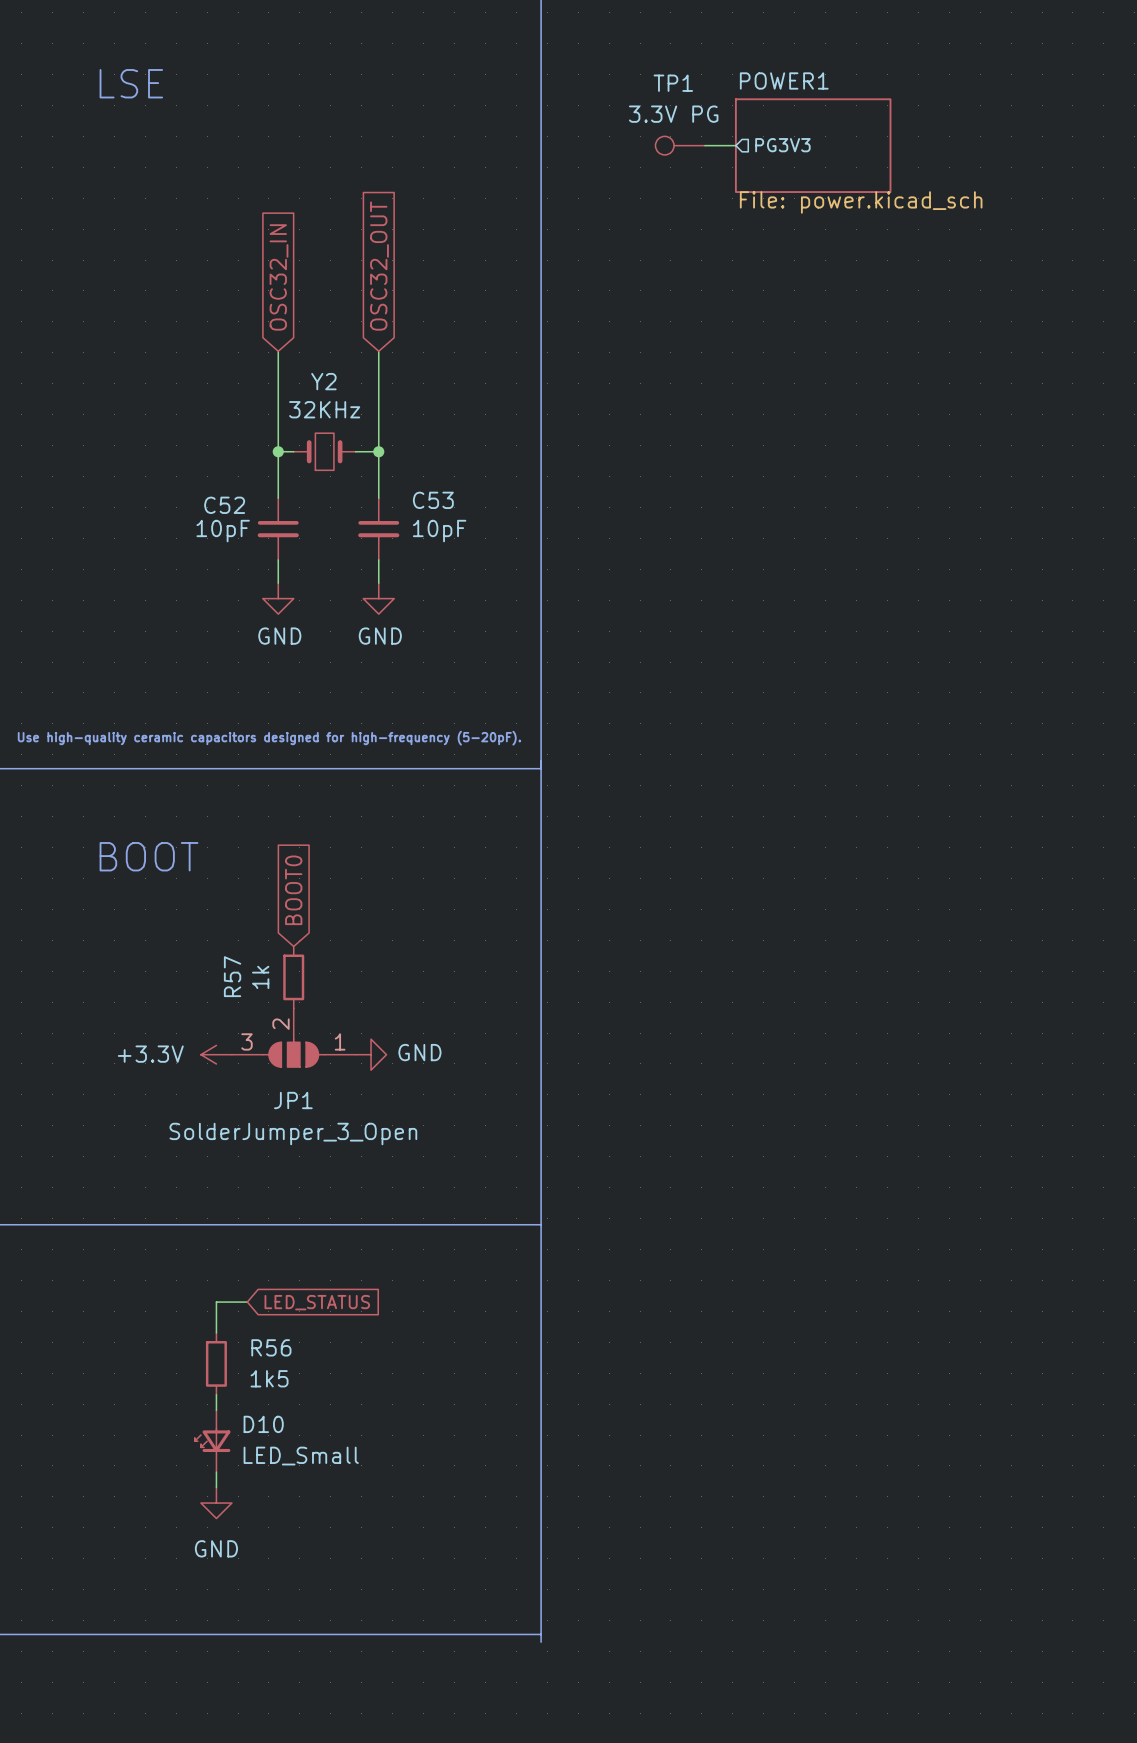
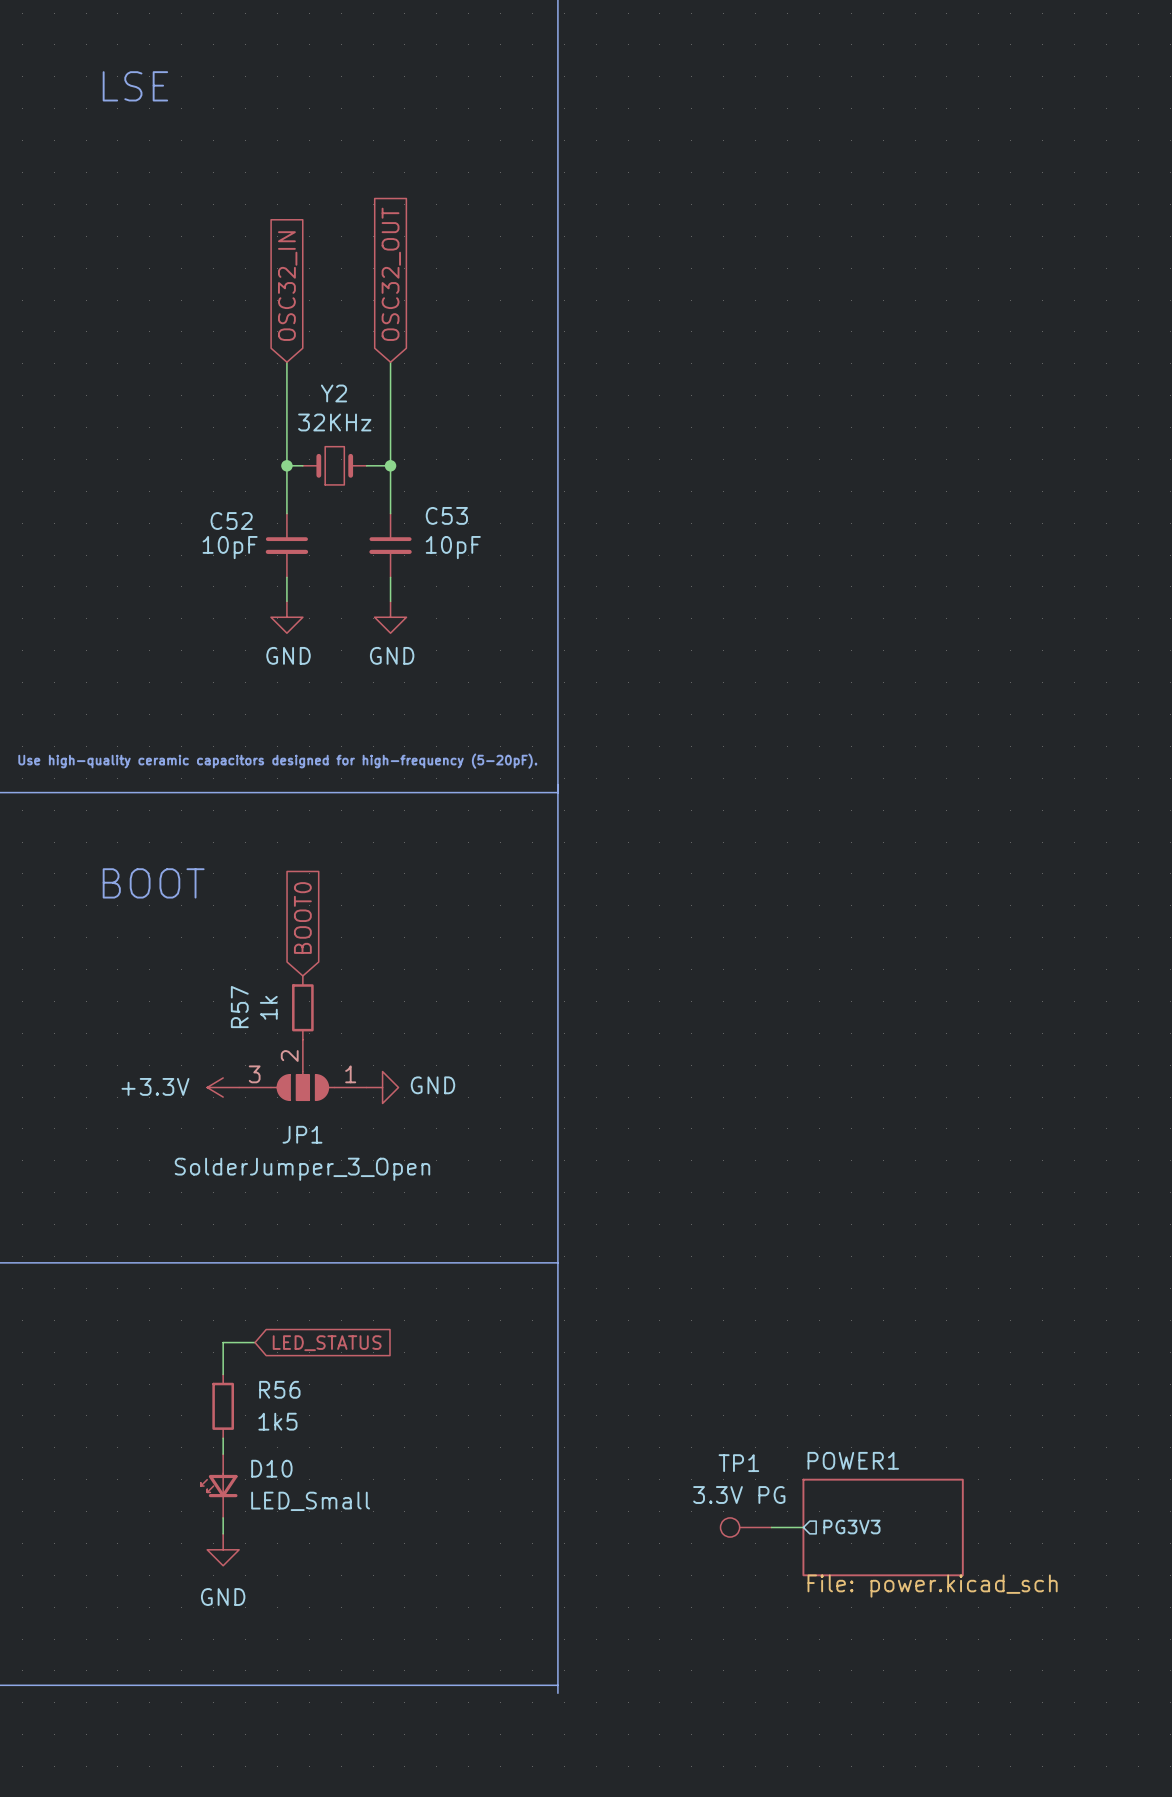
TP1 position: (680, 145) -> (746, 1527)
wire: (704, 145) (735, 145) -> none
sheet pin: PG3V3 (782, 145) -> none
sheet POWER1 position: (813, 145) -> (883, 1527)
sheet pin: none -> PG3V3 (851, 1527)
wire: none -> (771, 1527) (803, 1527)

